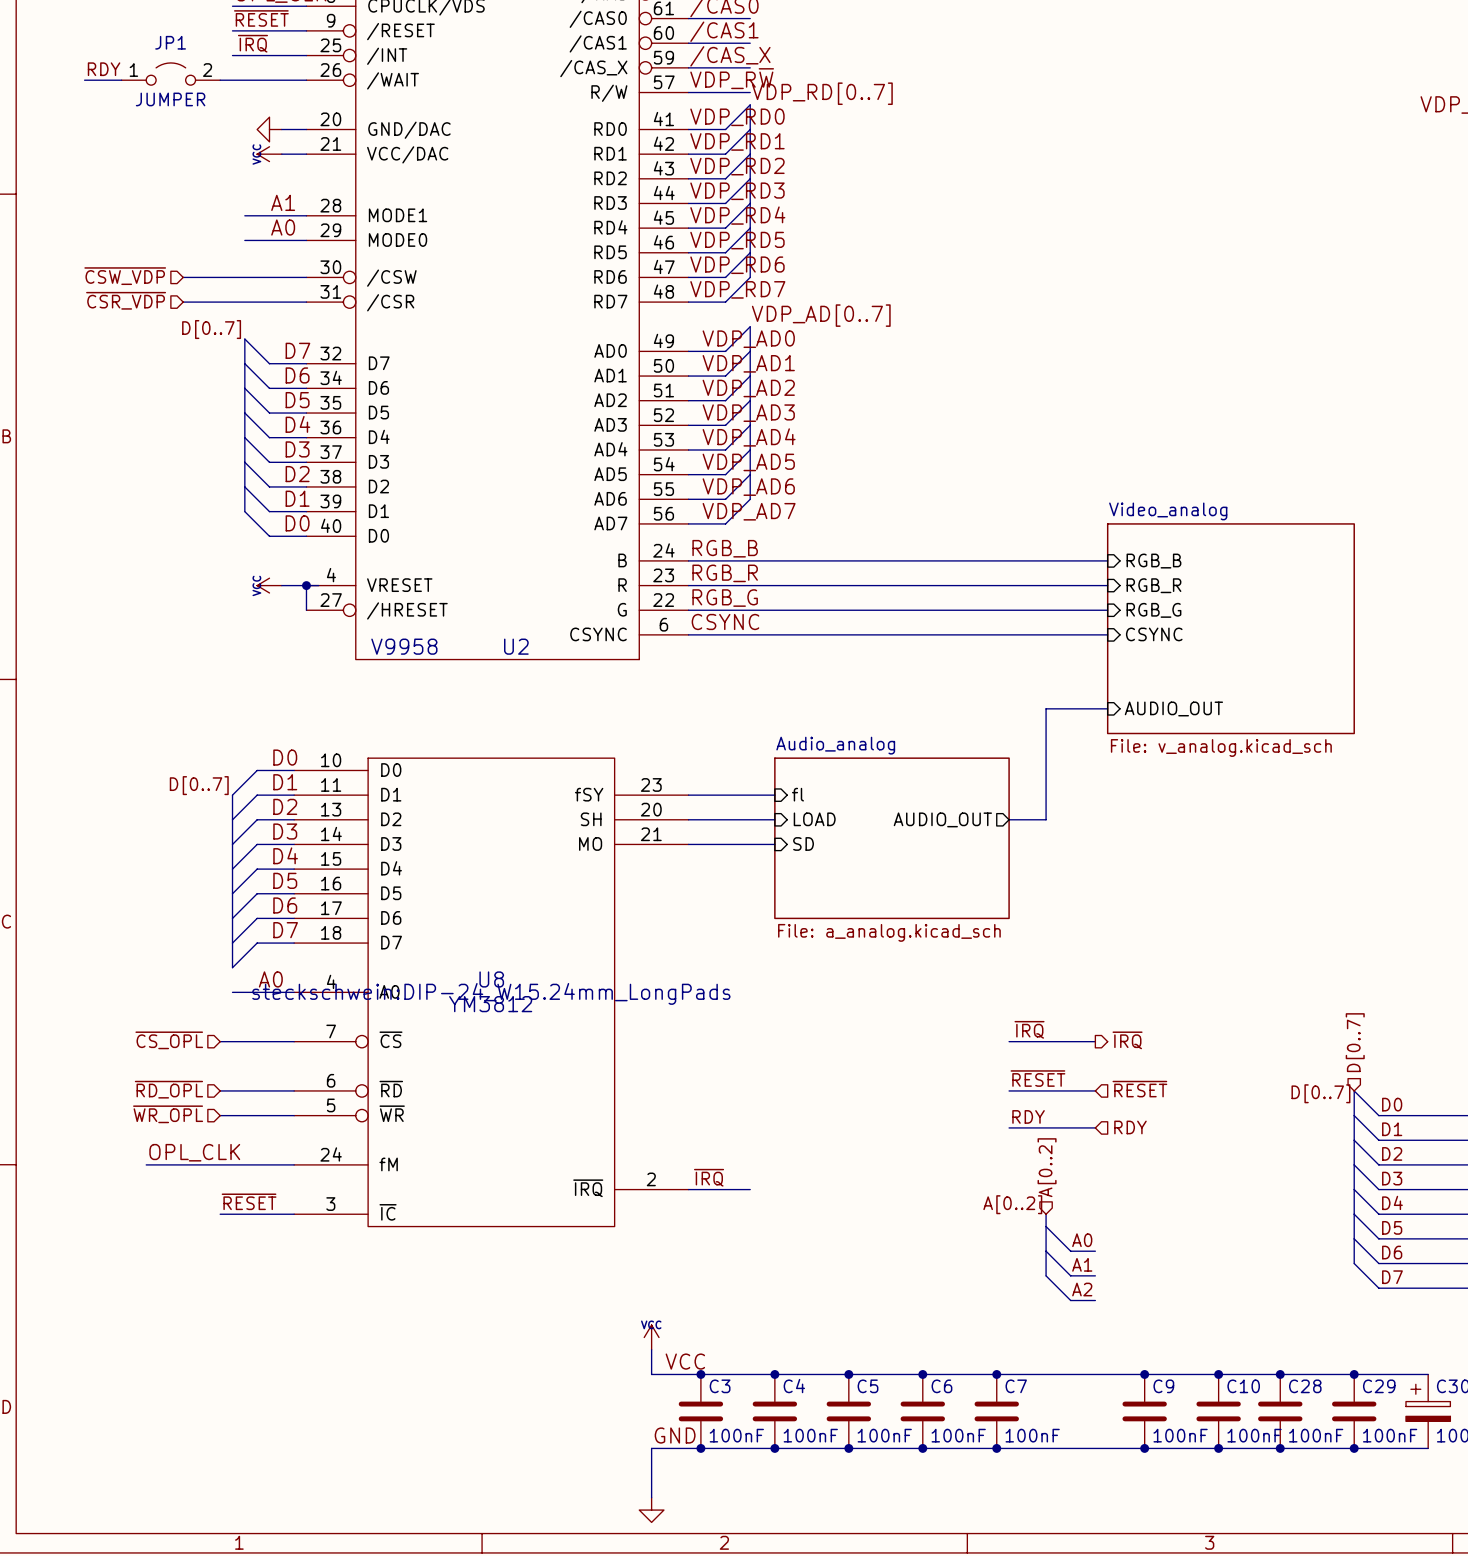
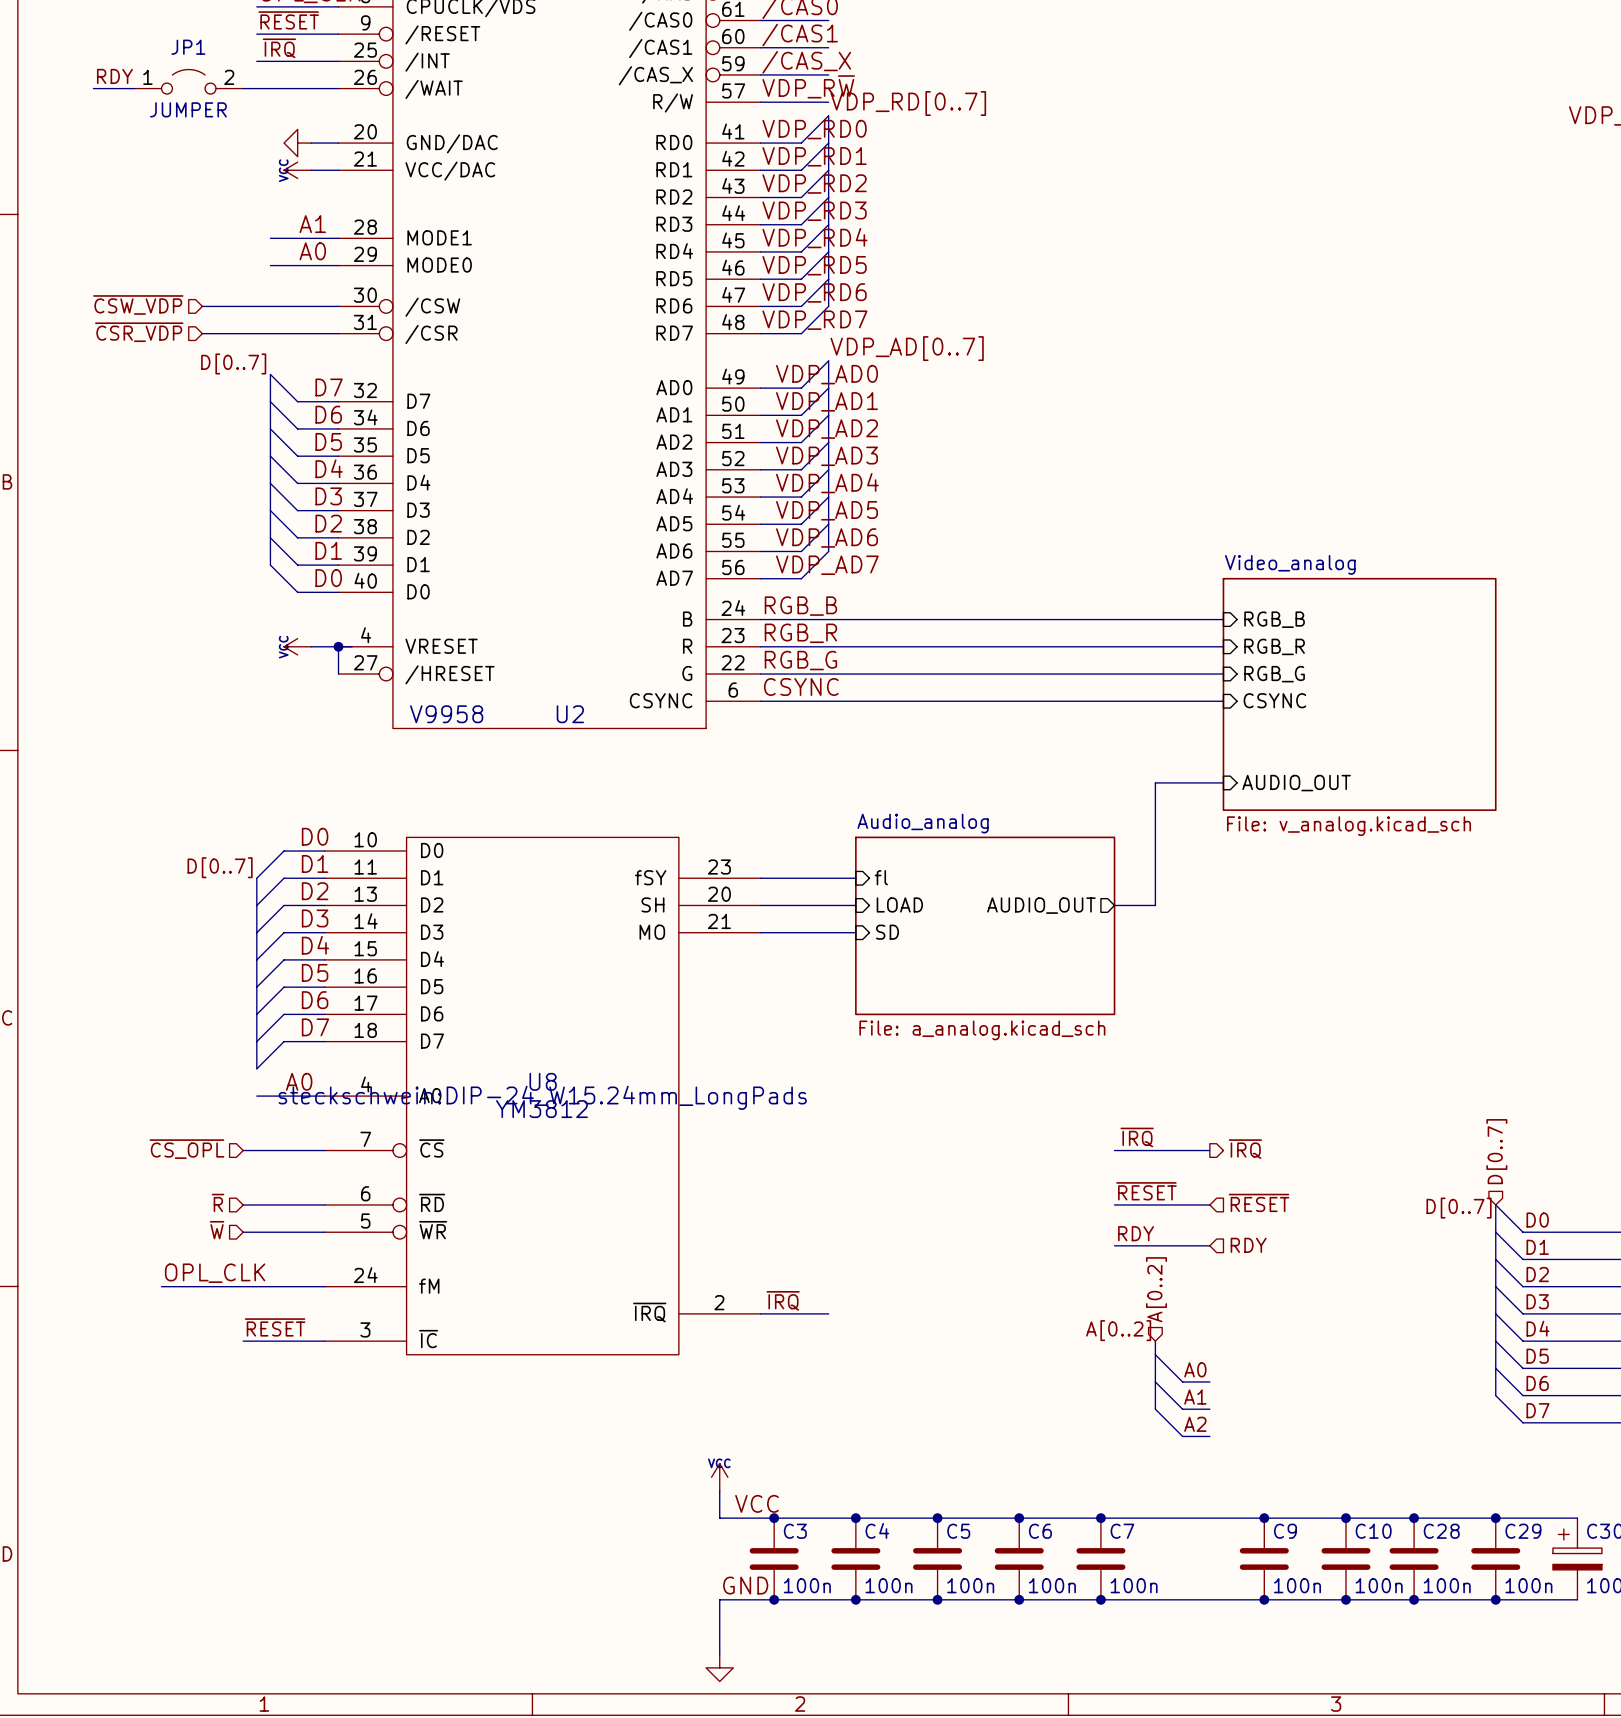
hierarchical label: ~{RD_OPL} (168, 1089) -> ~{R} (218, 1202)
hierarchical label: ~{WR_OPL} (168, 1114) -> ~{W} (217, 1230)
C3 value: 100nF (736, 1435) -> 100n (807, 1585)
C4 value: 100nF (810, 1435) -> 100n (889, 1585)
C5 value: 100nF (884, 1435) -> 100n (970, 1585)
C6 value: 100nF (958, 1435) -> 100n (1052, 1585)
C7 value: 100nF (1032, 1435) -> 100n (1134, 1585)
C9 value: 100nF (1180, 1435) -> 100n (1297, 1585)
C10 value: 100nF (1254, 1435) -> 100n (1379, 1585)
C28 value: 100nF (1316, 1435) -> 100n (1447, 1585)
C29 value: 100nF (1390, 1435) -> 100n (1528, 1585)

